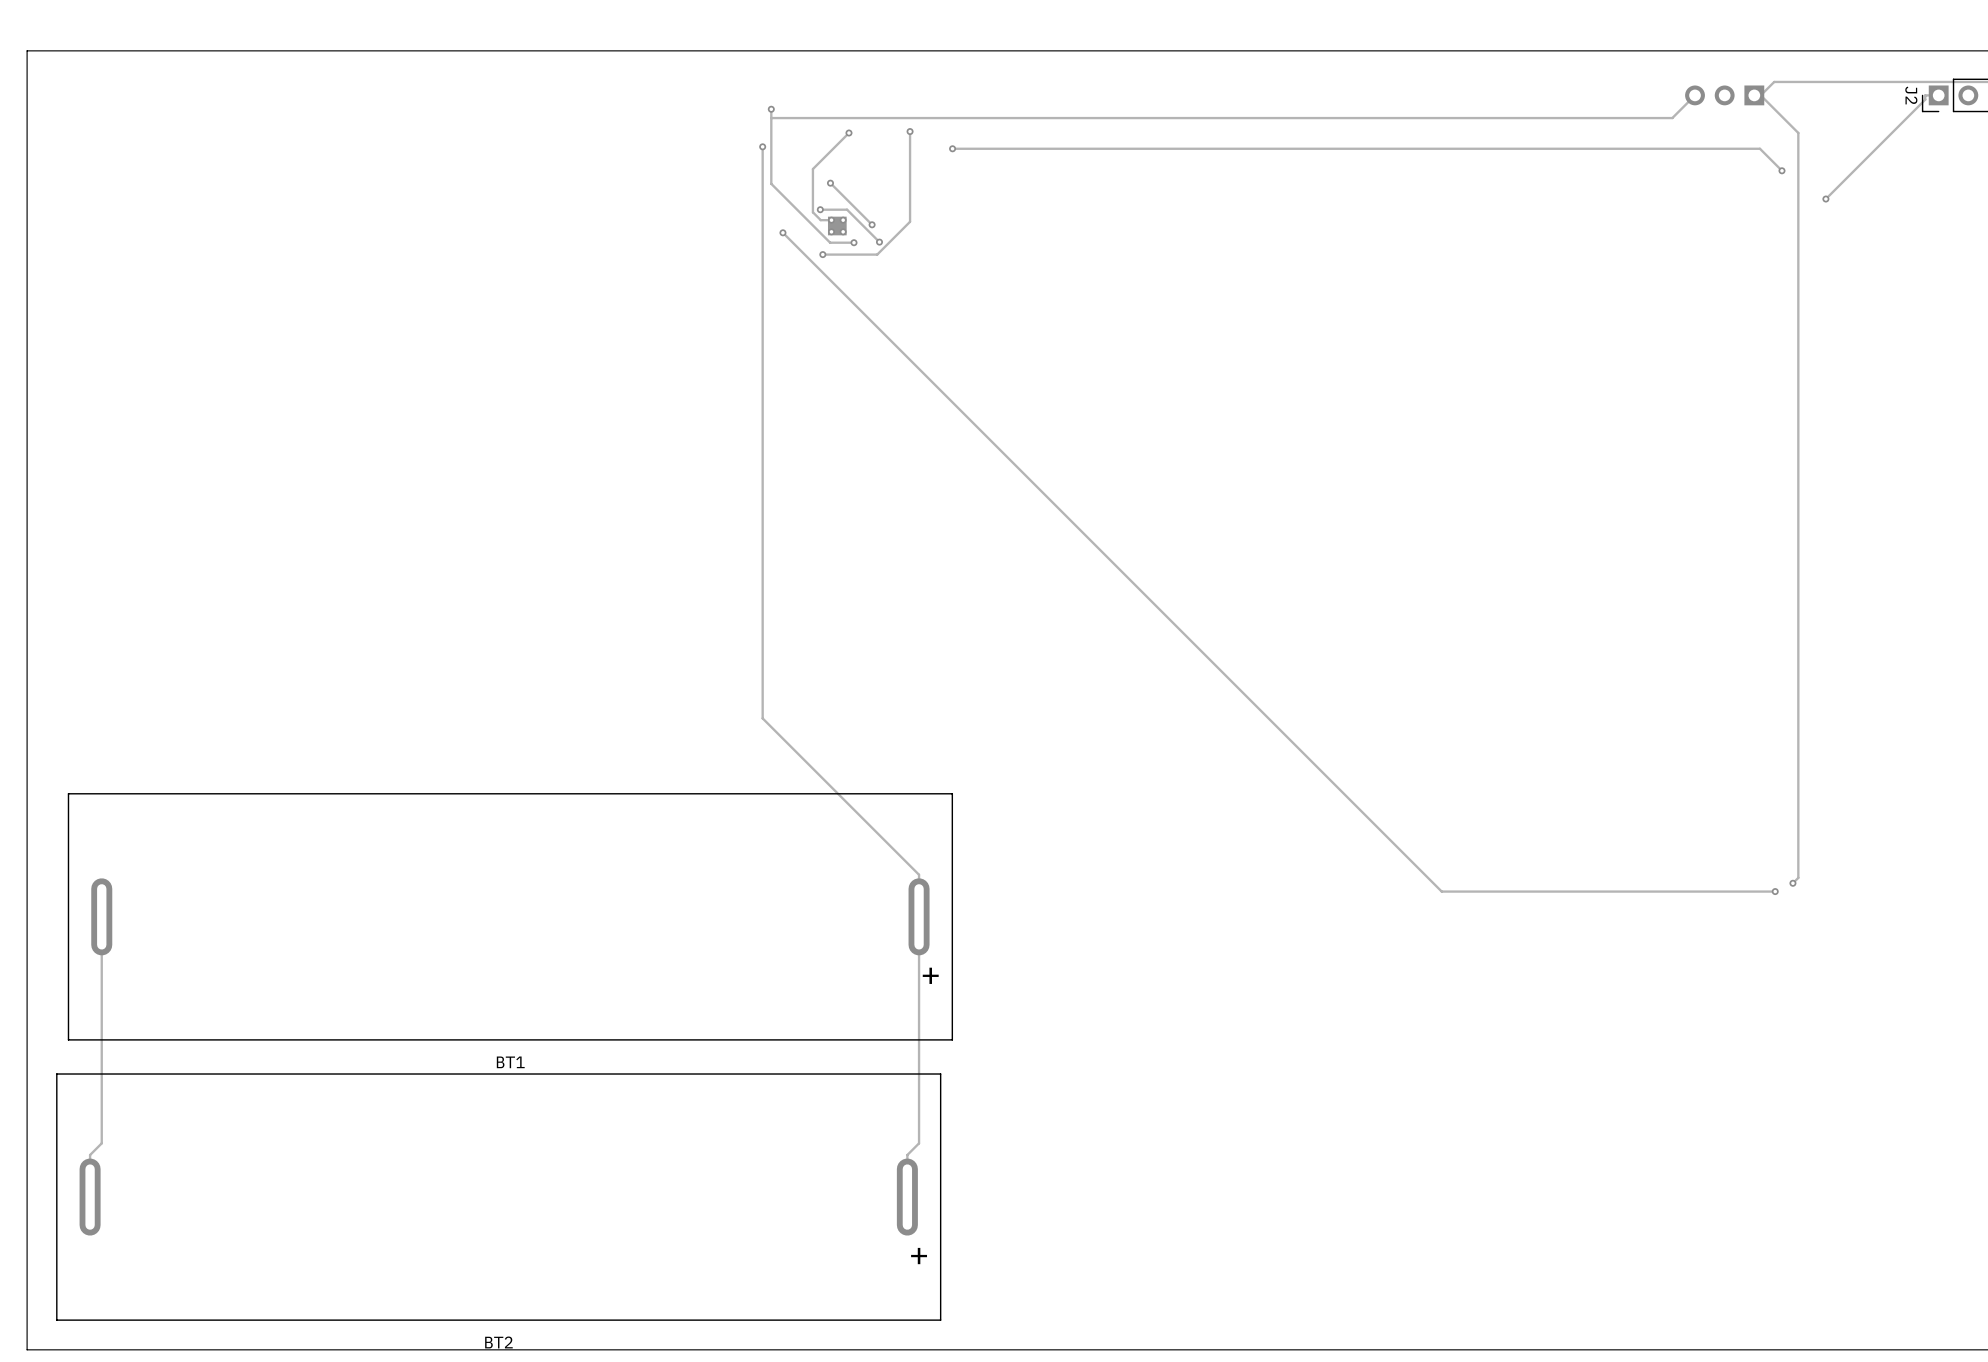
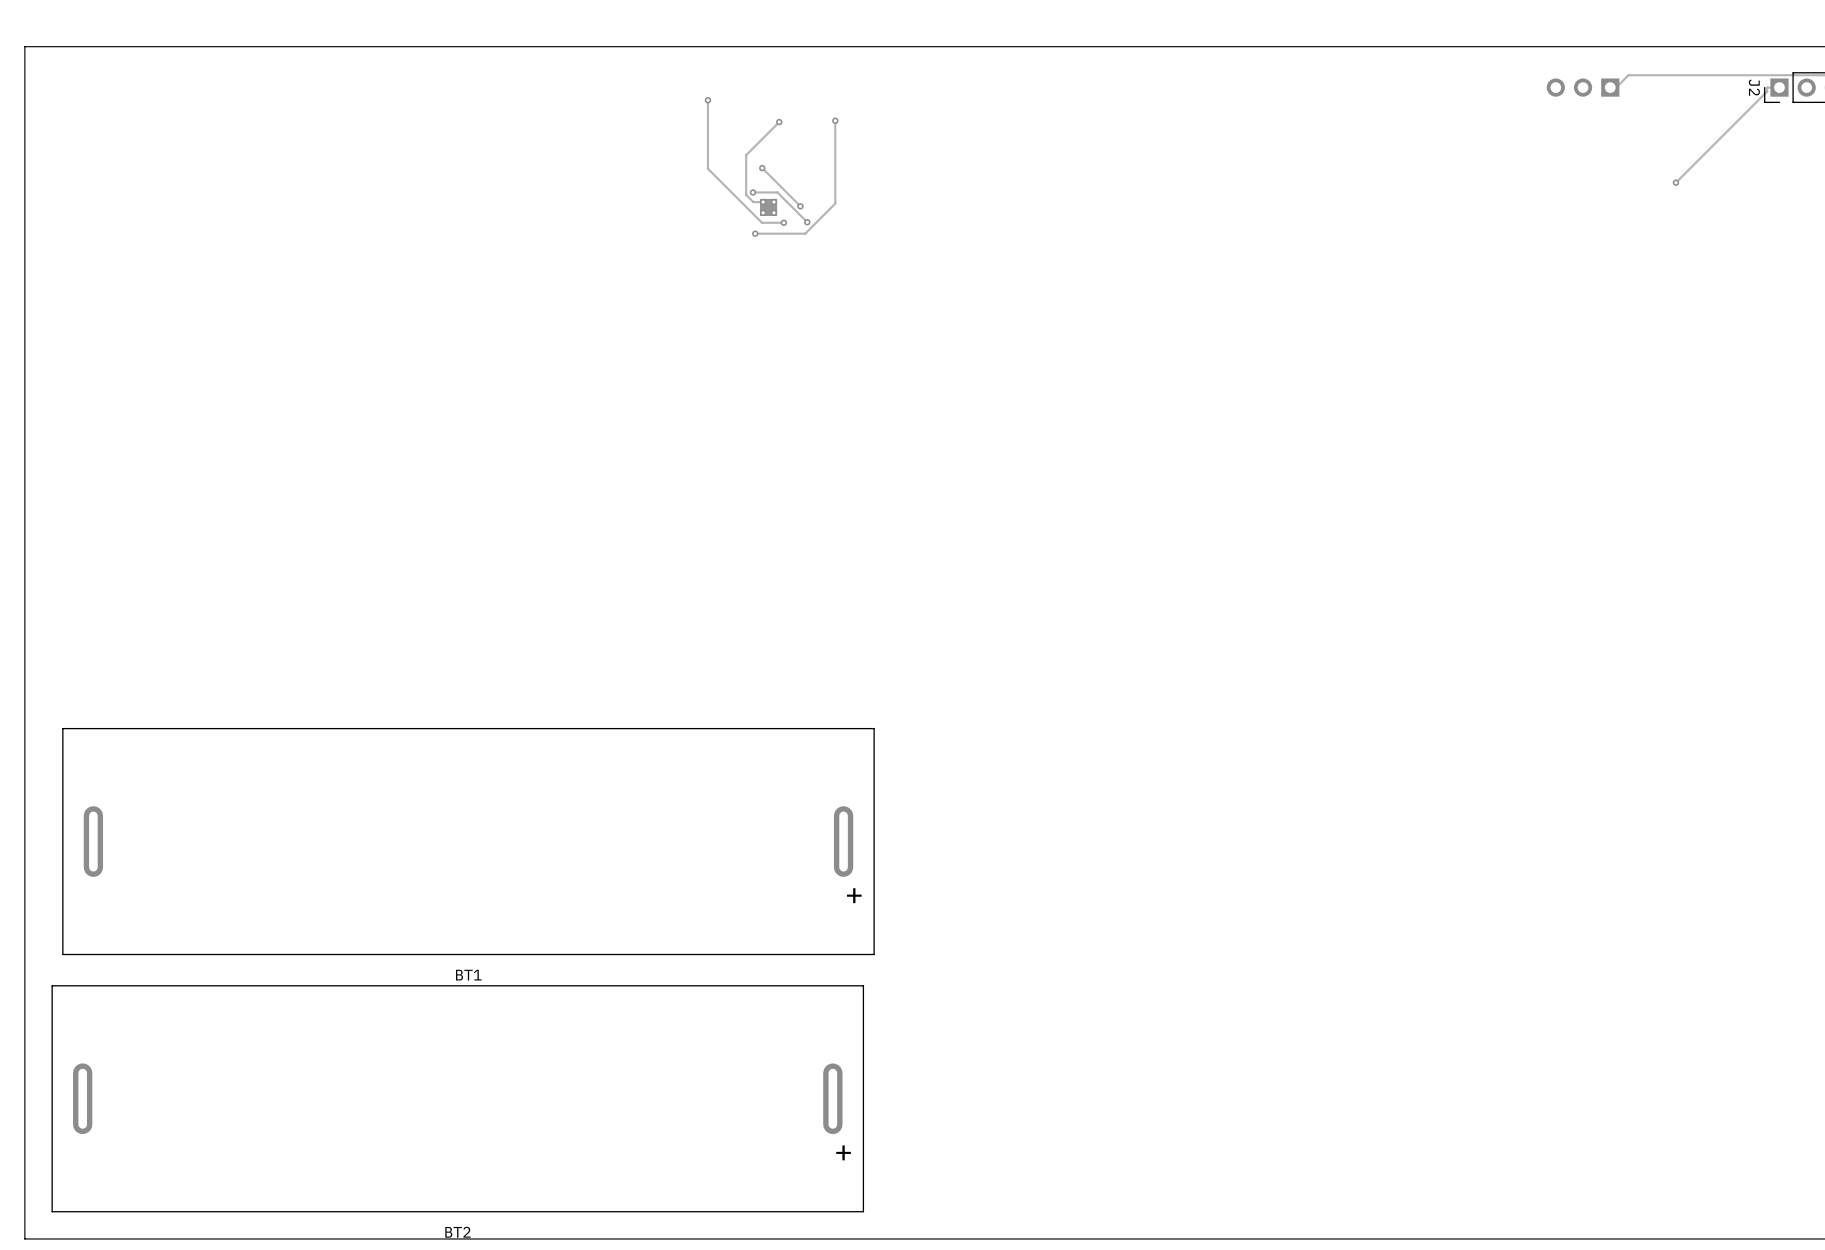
track: (1774, 81) (1760, 95) (1798, 132) (1798, 877) (1792, 883) -> (1628, 75) (1616, 87)
track: (1695, 95) (1672, 118) (771, 118) -> none
track: (762, 146) (762, 718) (919, 874) (919, 1143) (907, 1155) (907, 1197) -> none
via: (762, 146) -> none
track: (952, 148) (1759, 148) (1781, 170) -> none
via: (952, 148) -> none
via: (1781, 170) -> none
track: (782, 232) (1441, 891) (1775, 891) -> none
via: (782, 232) -> none
via: (1792, 883) -> none
via: (1775, 891) -> none
track: (101, 916) (101, 1143) (90, 1155) (90, 1197) -> none

